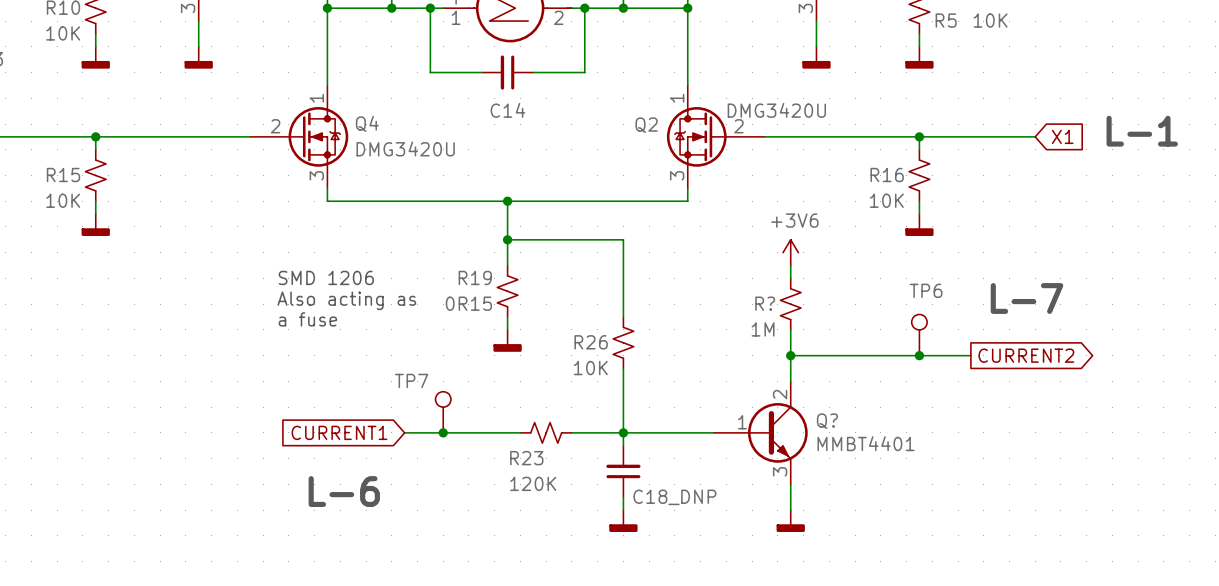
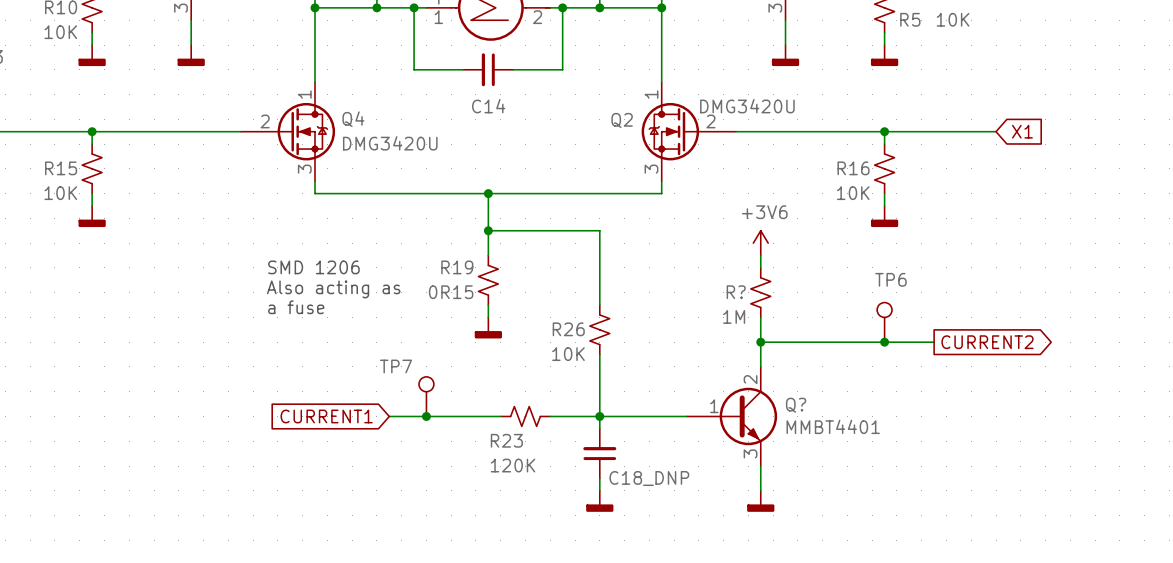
text: L-1 (1142, 131) -> none
text: L-7 (1026, 298) -> none
text: L-6 (344, 491) -> none

